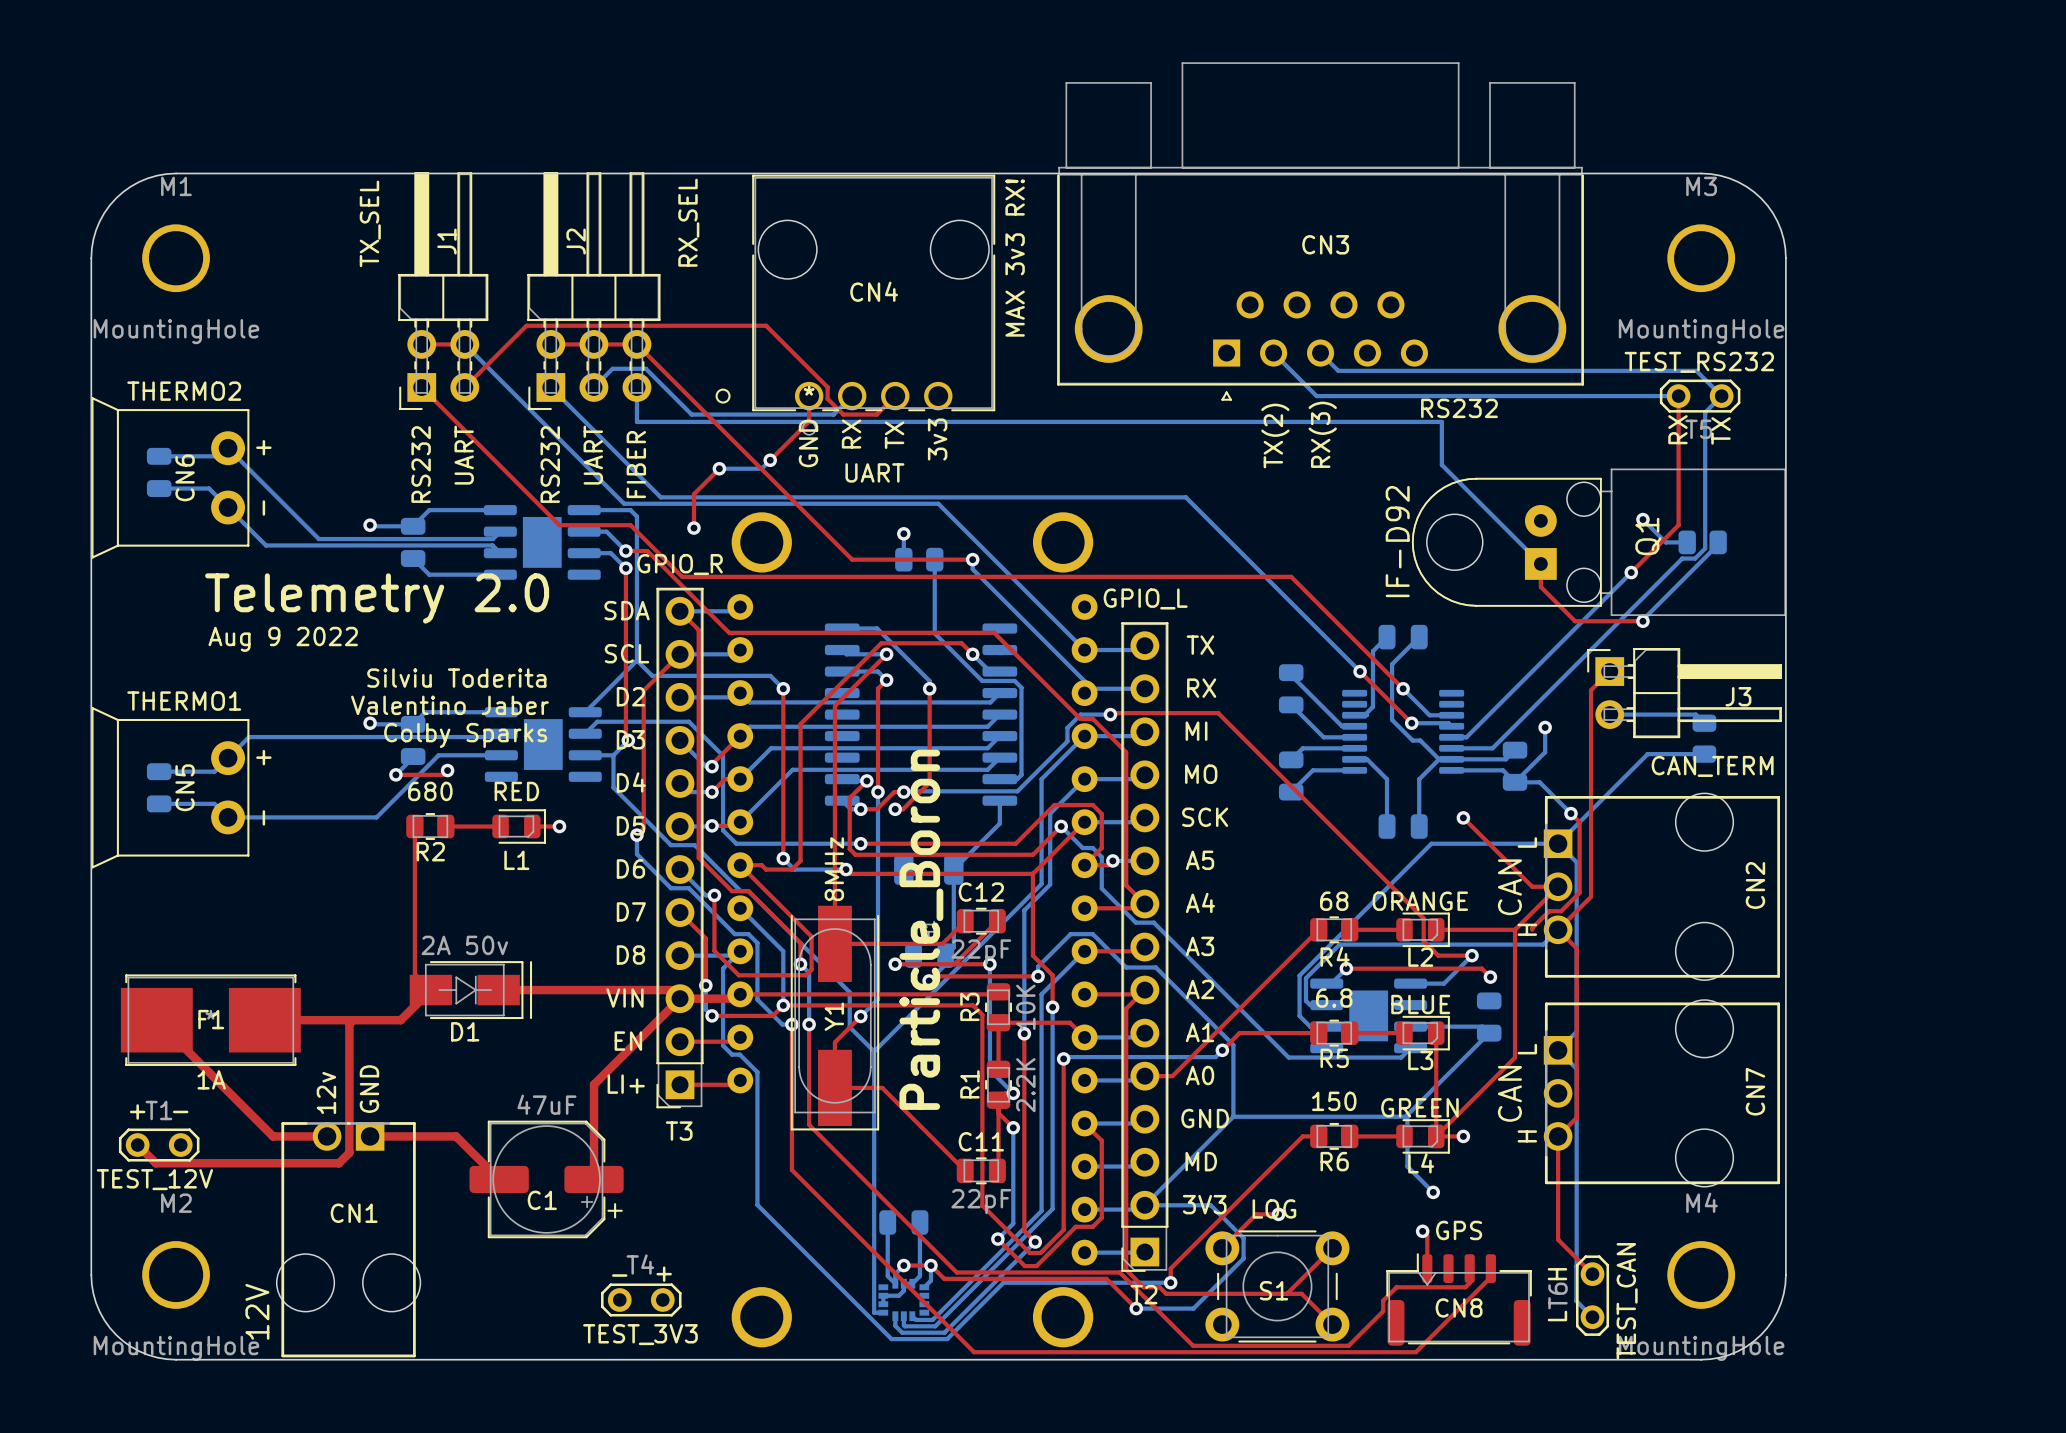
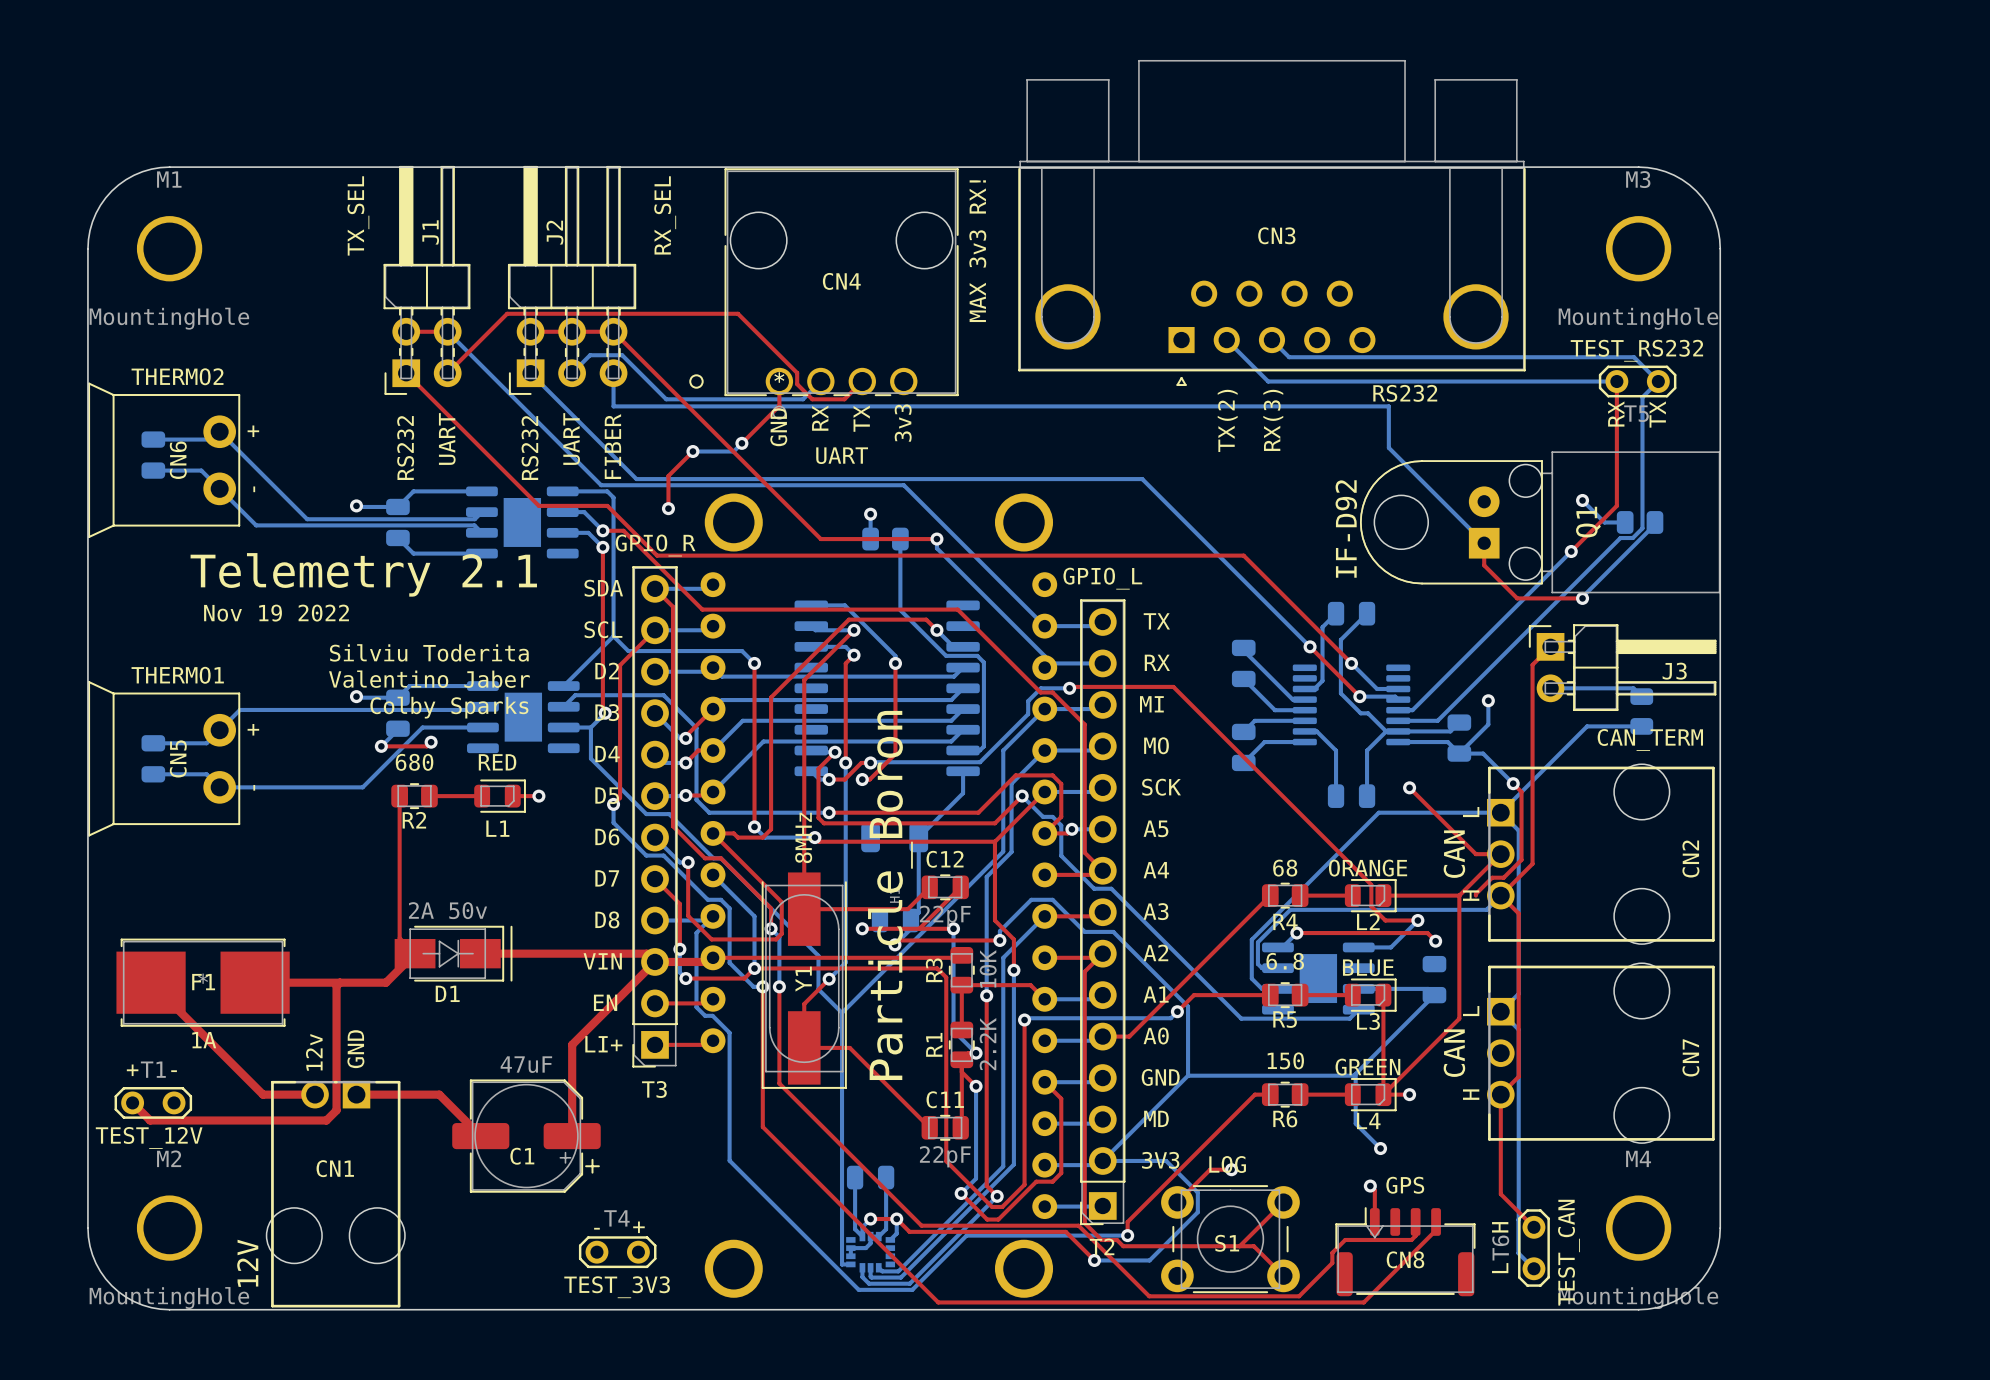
text: Telemetry 2.0 (377, 598) -> Telemetry 2.1 (363, 574)
text: Aug 9 2022 (283, 639) -> Nov 19 2022 (276, 613)

